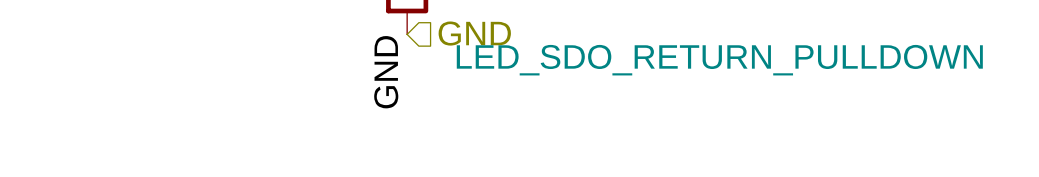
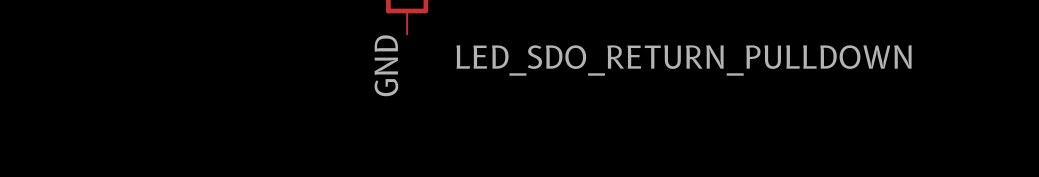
hierarchical label: GND (474, 33) -> none

